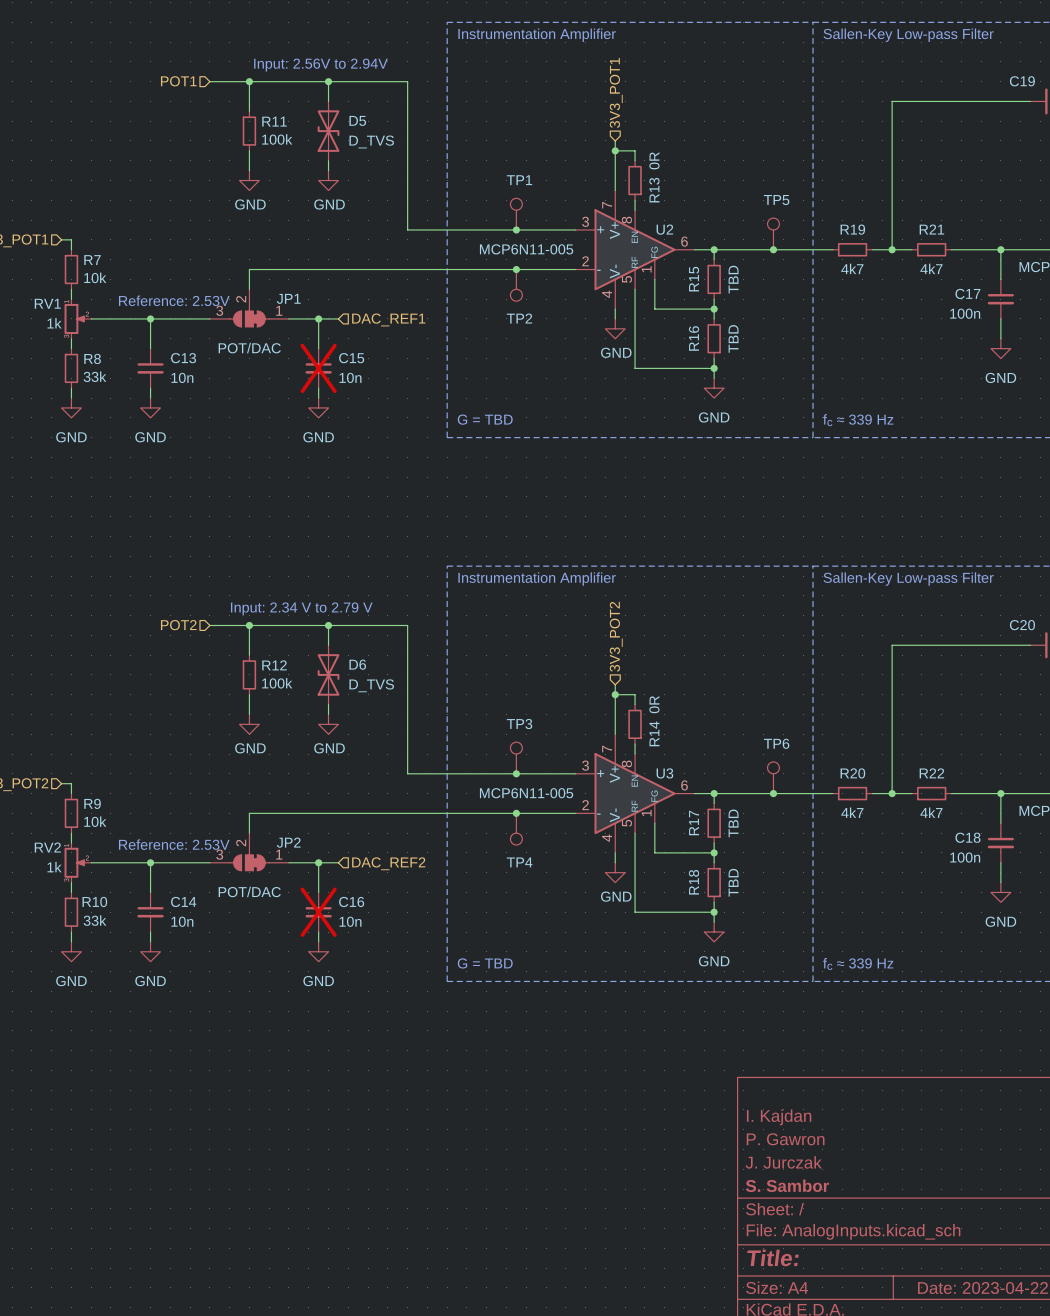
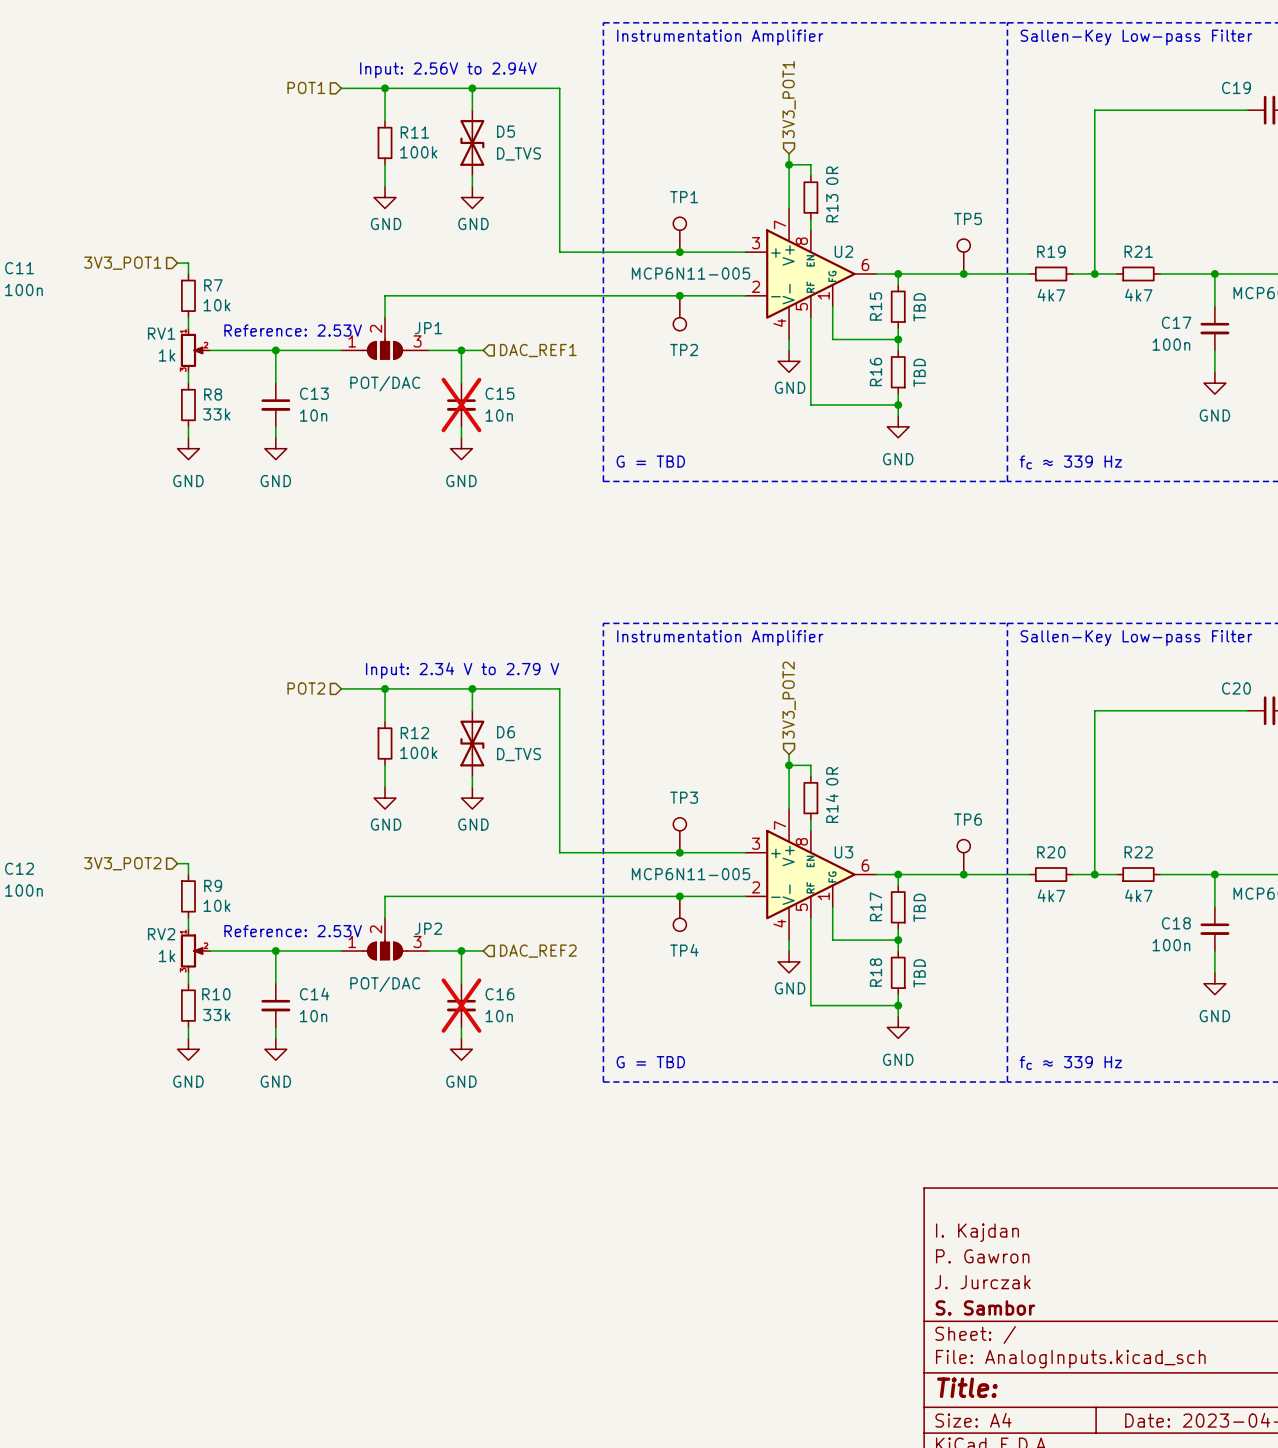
JP1 symbol: [209, 289, 289, 327] -> [341, 317, 429, 360]
JP2 symbol: [209, 833, 289, 871] -> [341, 918, 429, 960]

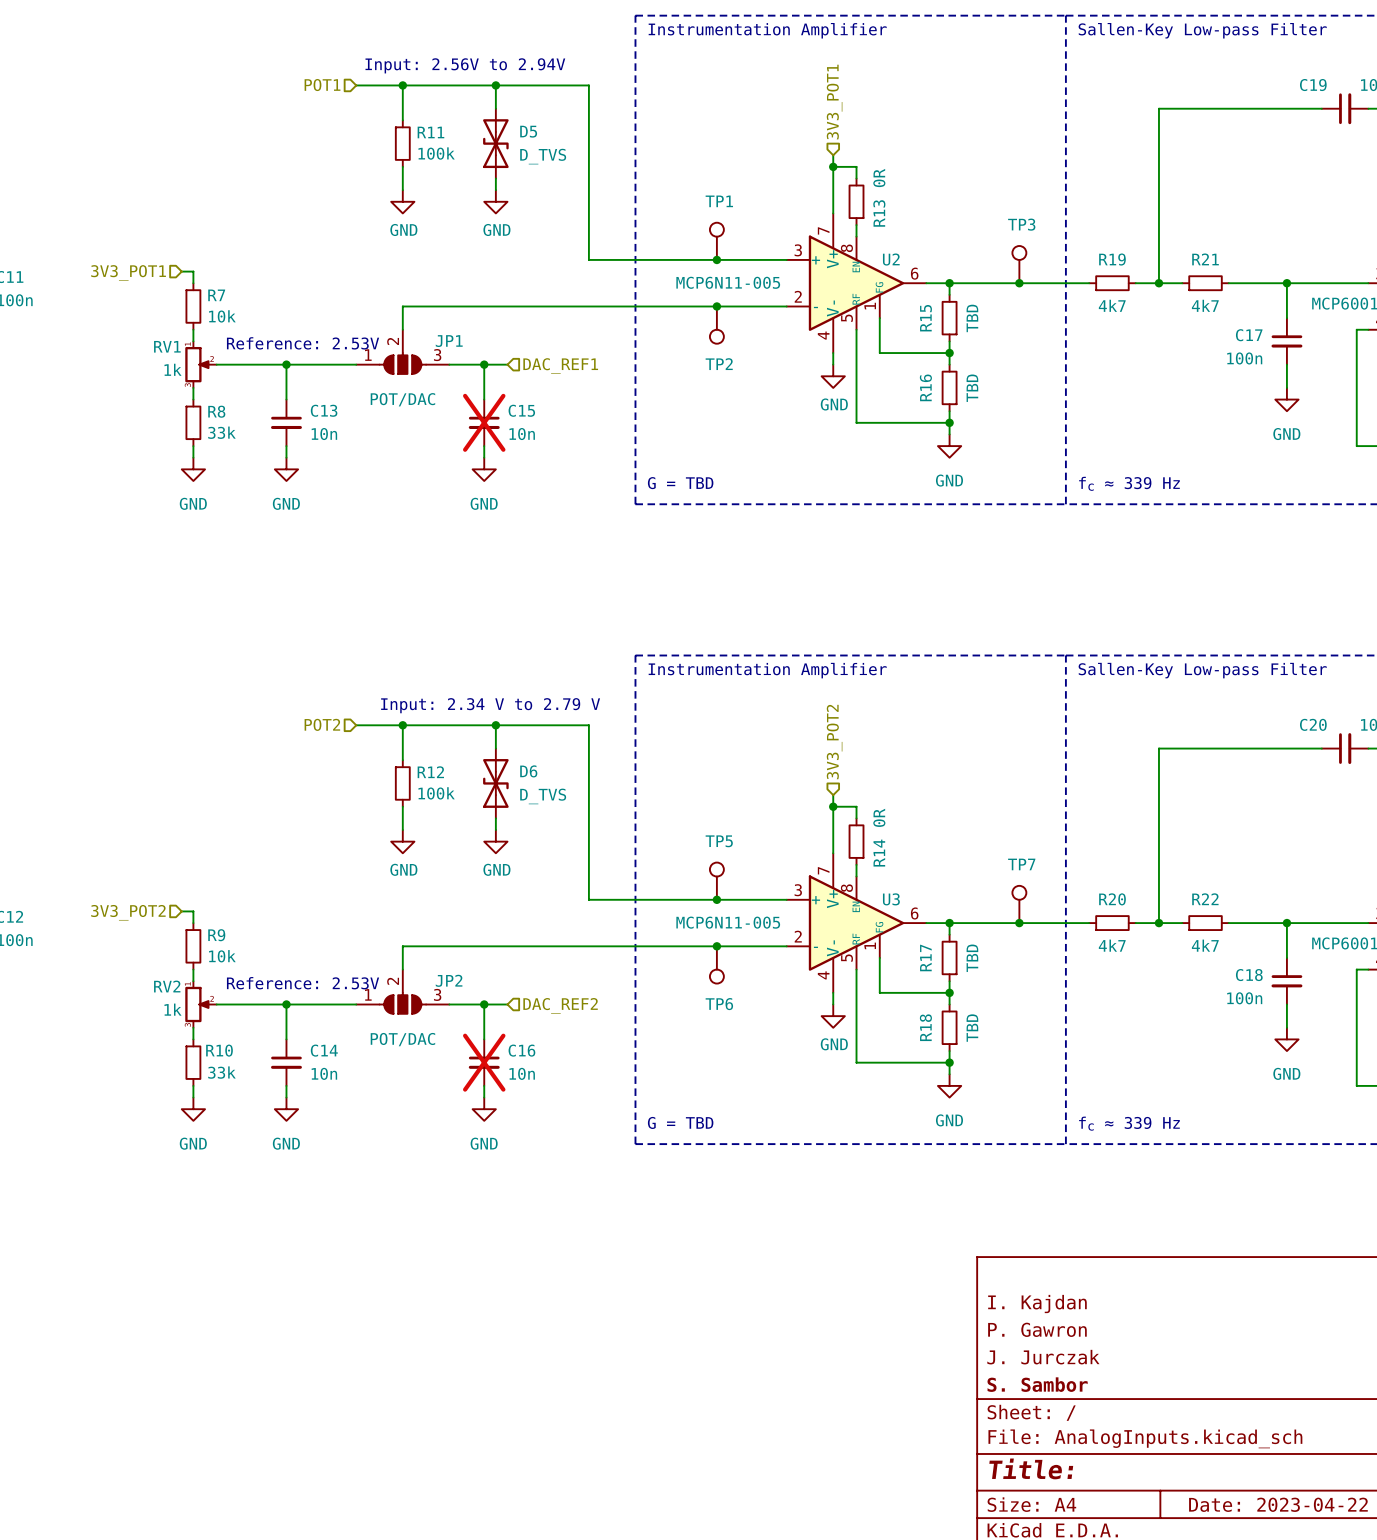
TP5 name: TP5 (968, 218) -> TP3 (1021, 224)
TP3 name: TP3 (684, 797) -> TP5 (719, 841)
TP6 name: TP6 (968, 819) -> TP7 (1021, 864)
TP4 name: TP4 (684, 950) -> TP6 (719, 1004)

